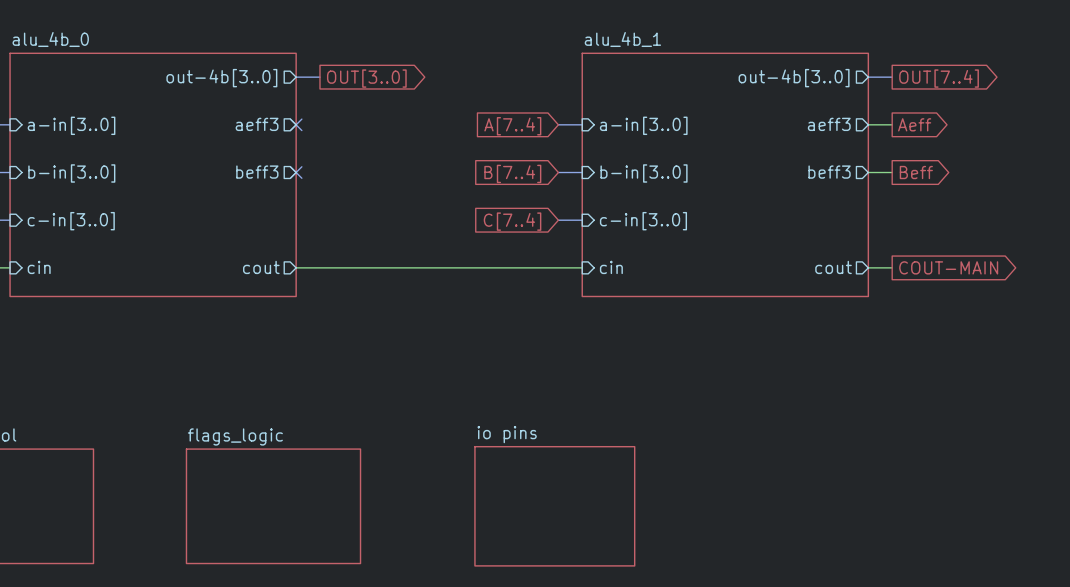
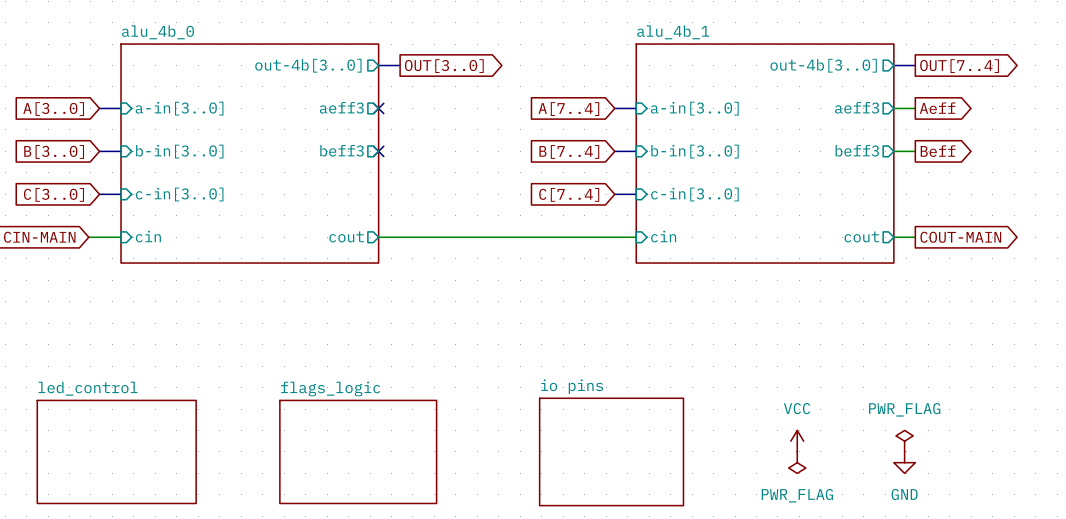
power symbol: none -> VCC (797, 441)
power symbol: none -> PWR_FLAG (904, 441)
power symbol: none -> PWR_FLAG (797, 462)
power symbol: none -> GND (904, 462)

